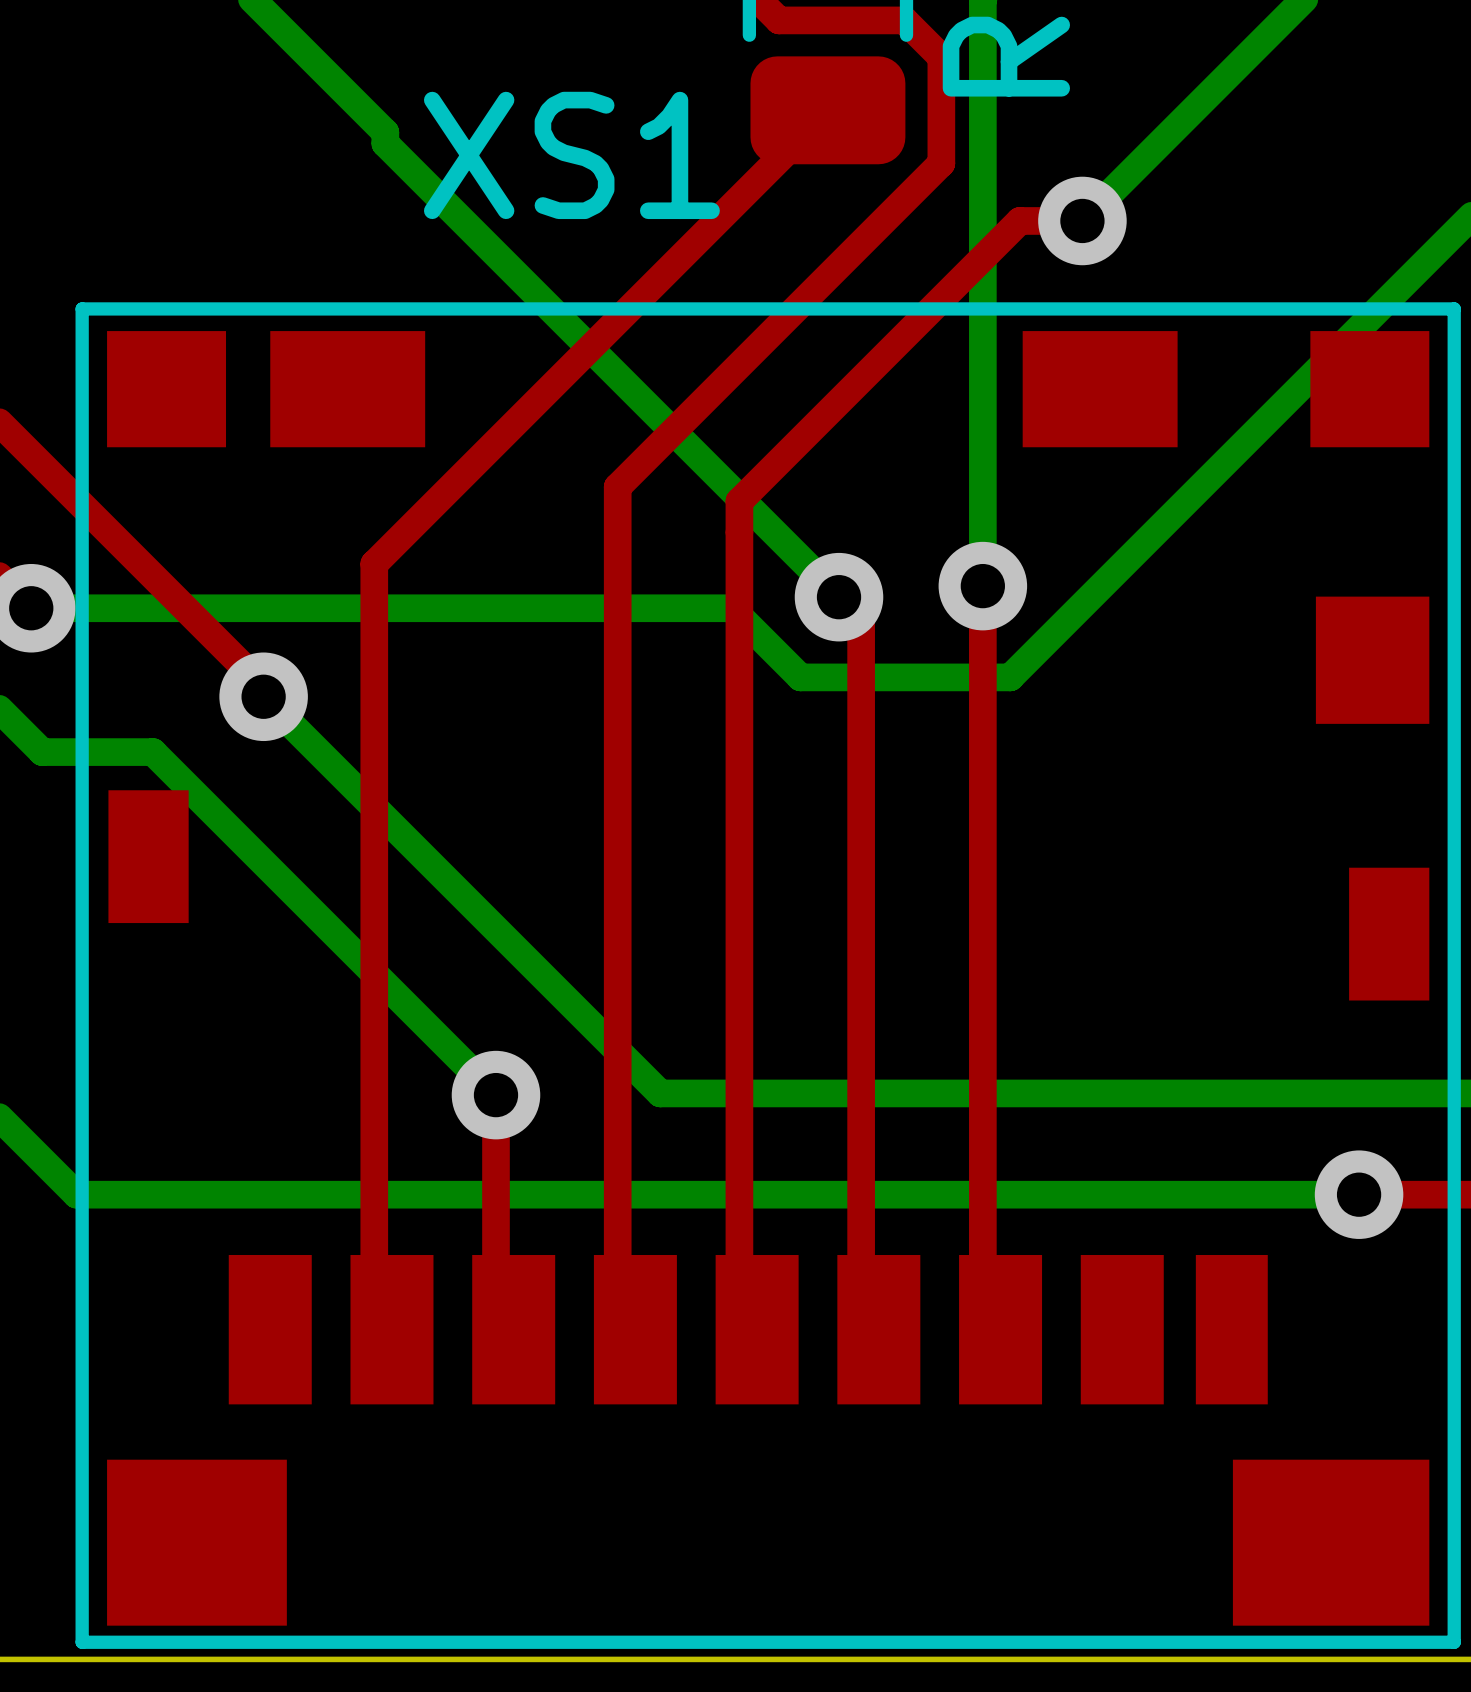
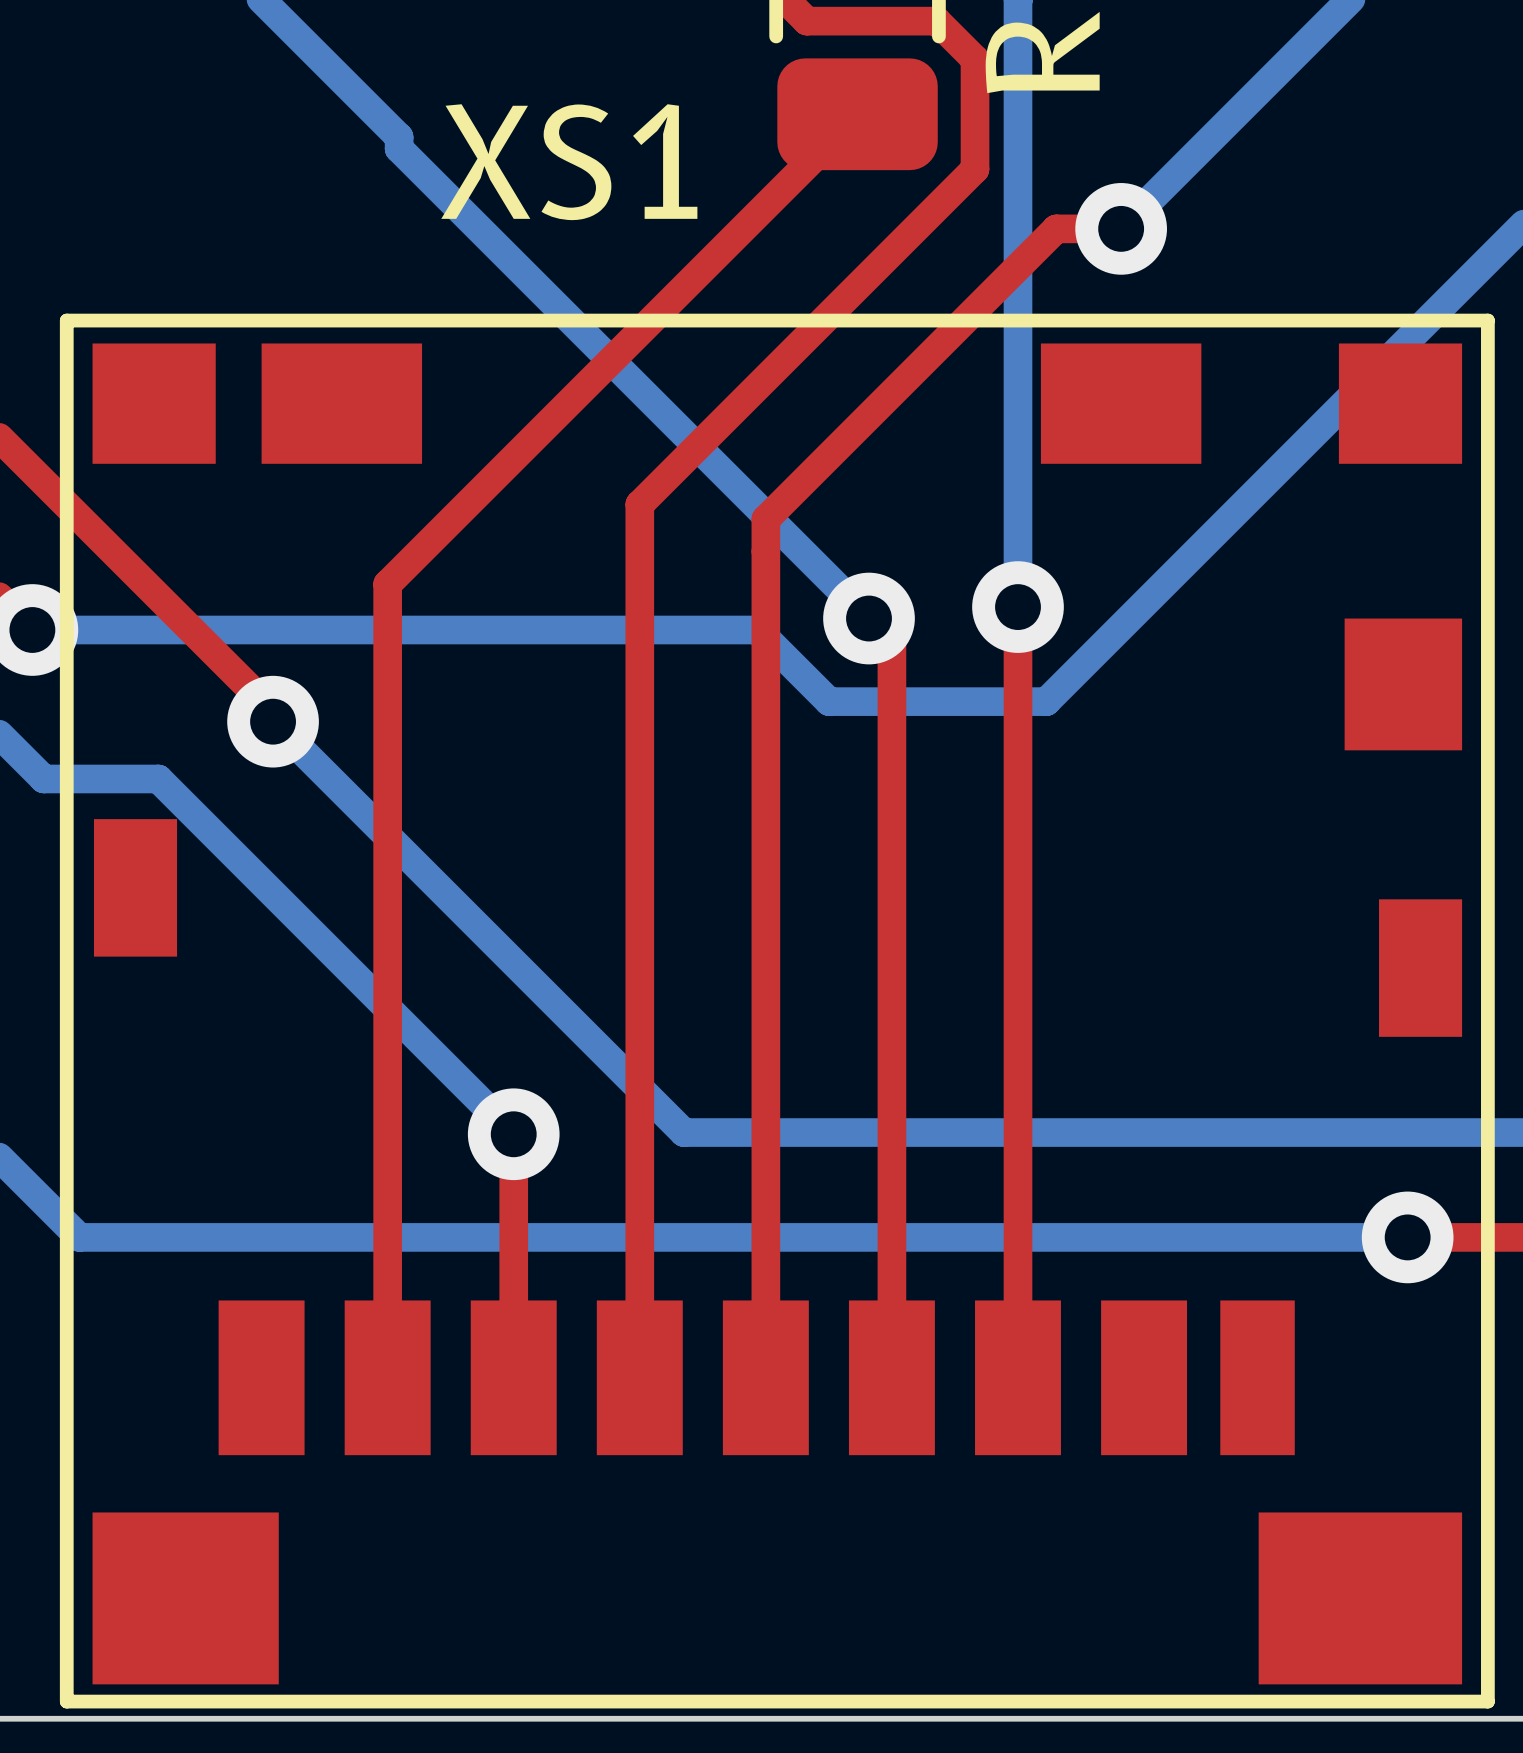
XS1 position: (768, 975) -> (777, 1011)

